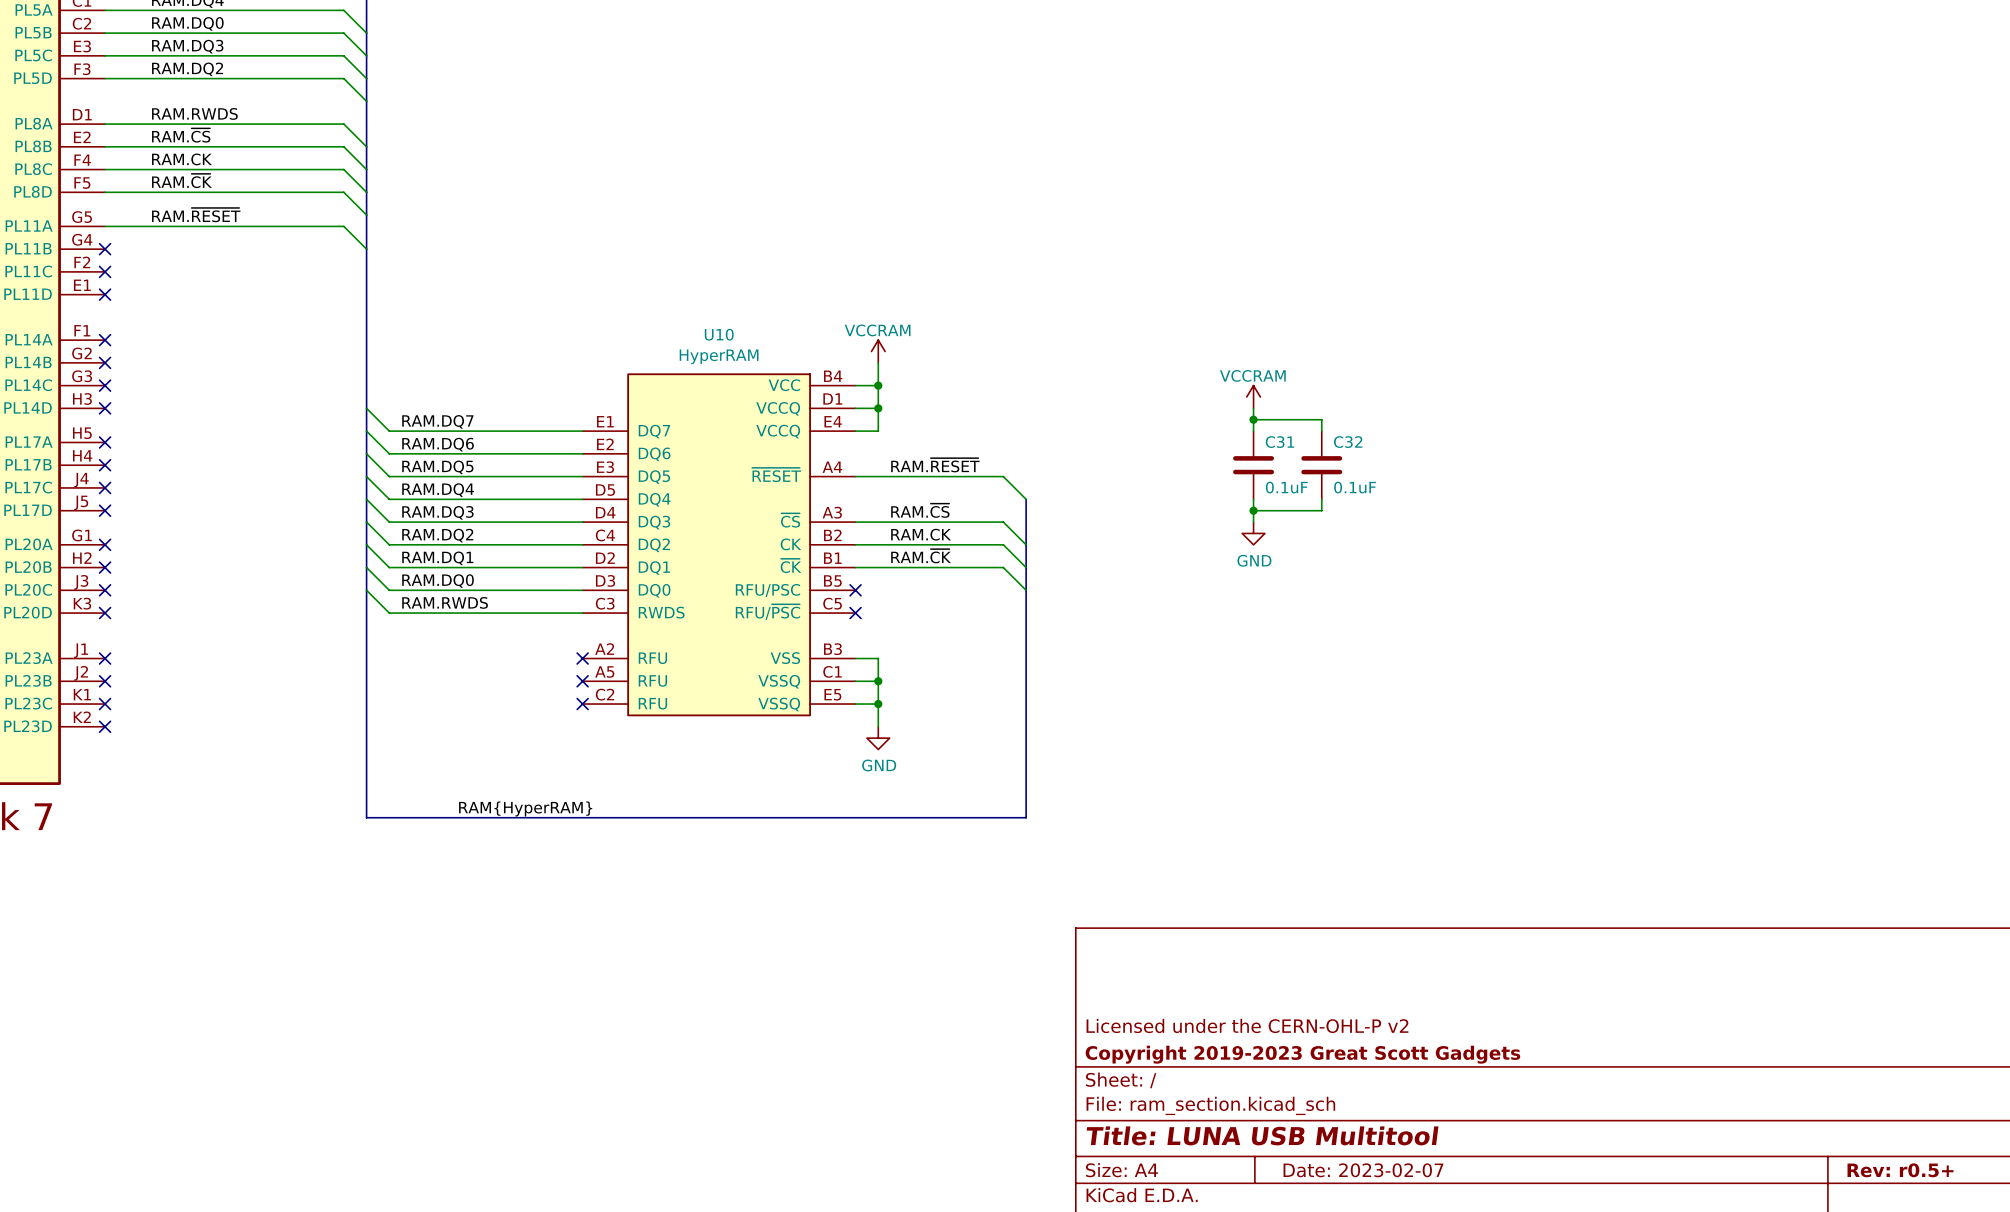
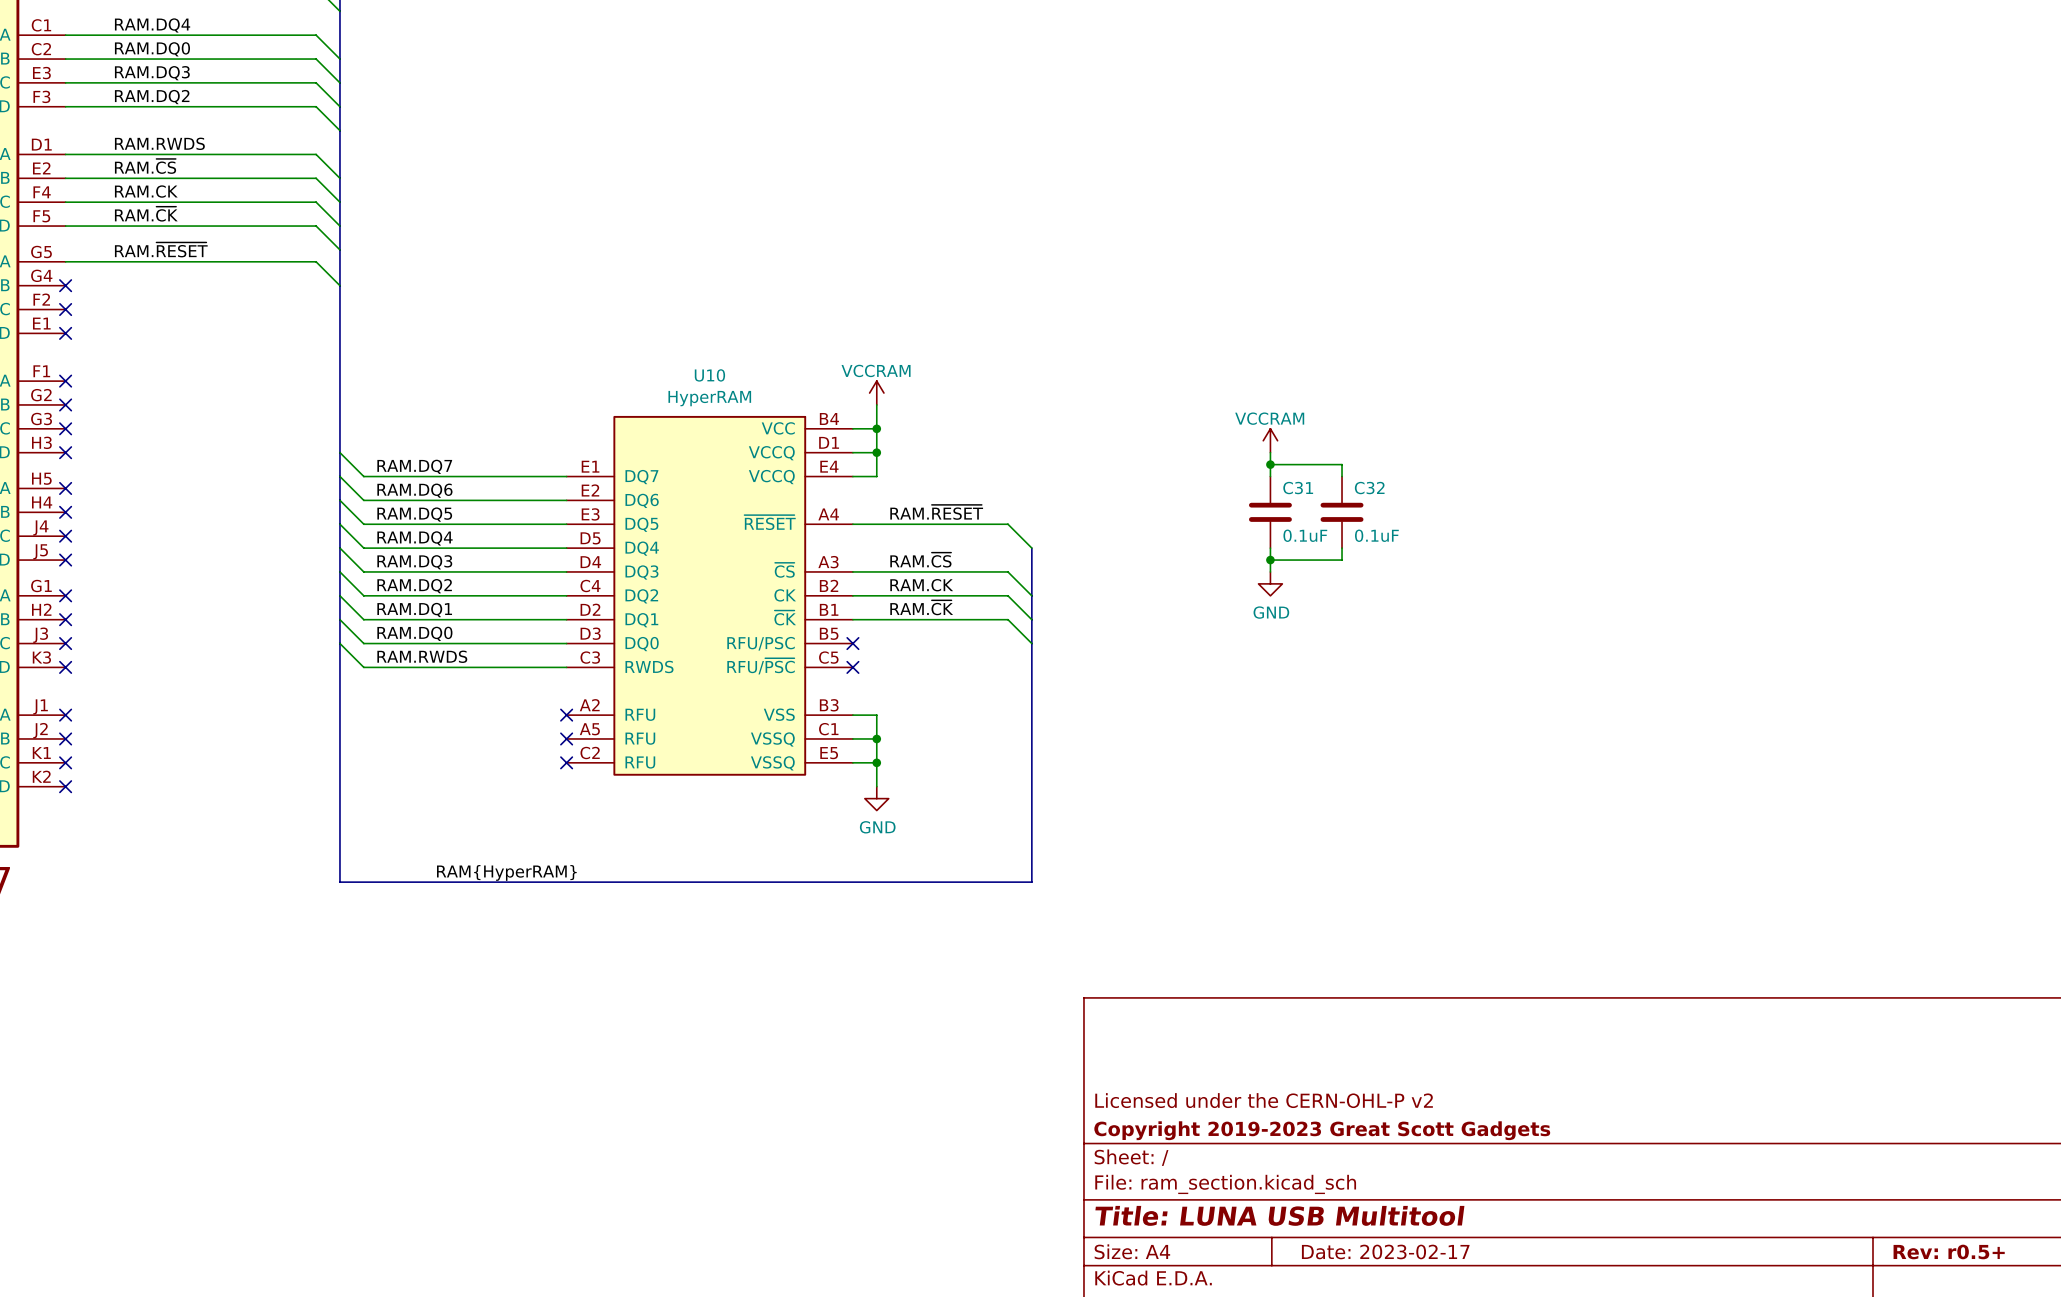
title block: Date: 2023-02-07 (1363, 1170) -> Date: 2023-02-17 (1385, 1251)

